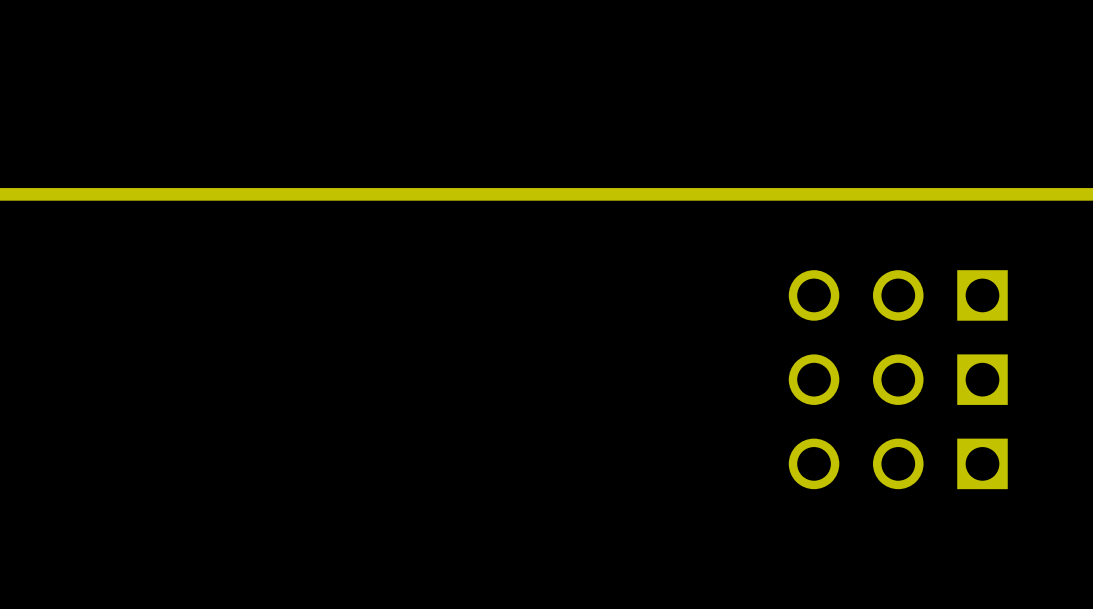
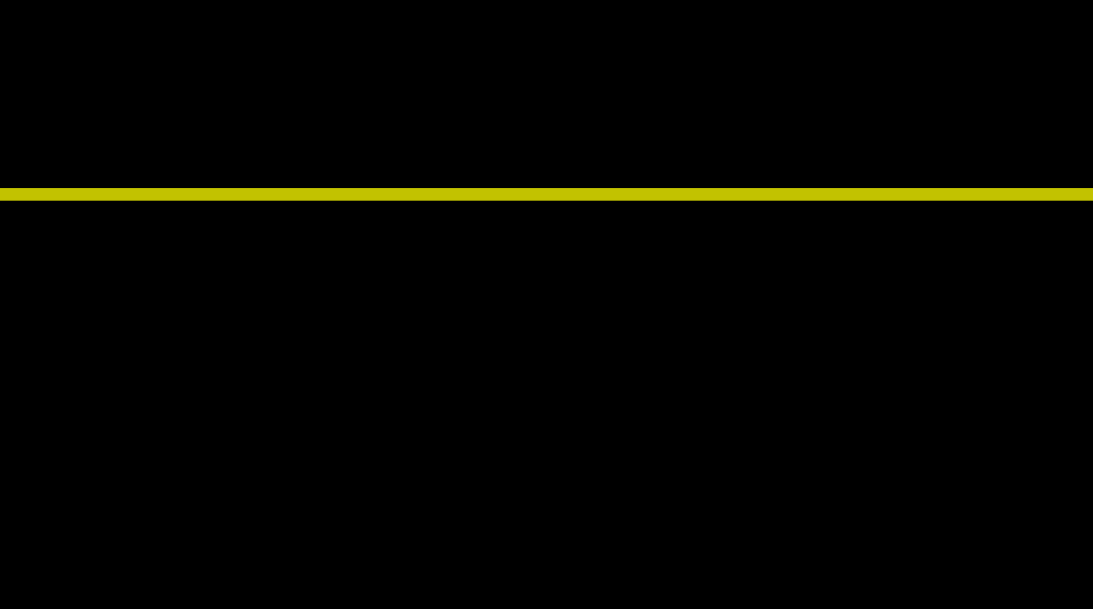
part: (898, 295) -> none
part: (898, 379) -> none
part: (898, 463) -> none

